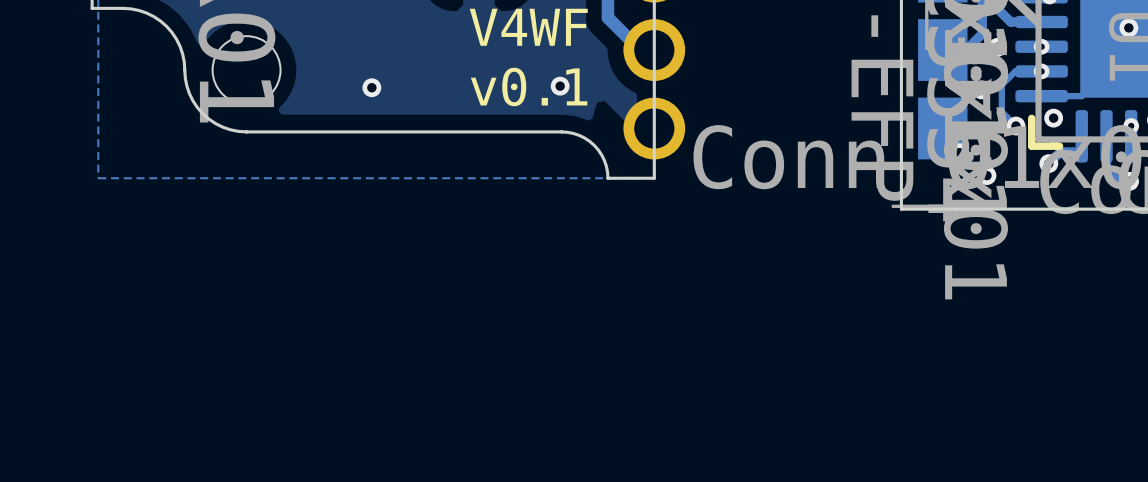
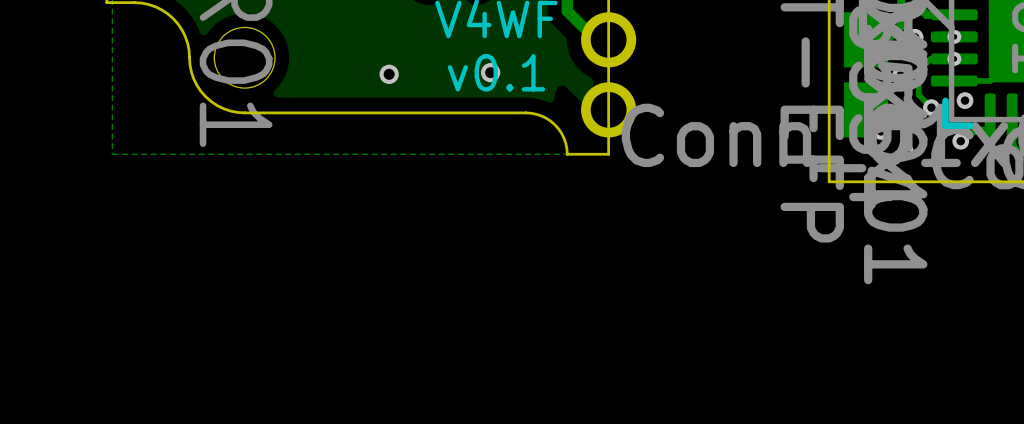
via: none -> (490, 72)
via: (560, 86) -> none
via: (371, 87) -> none
via: none -> (389, 74)

